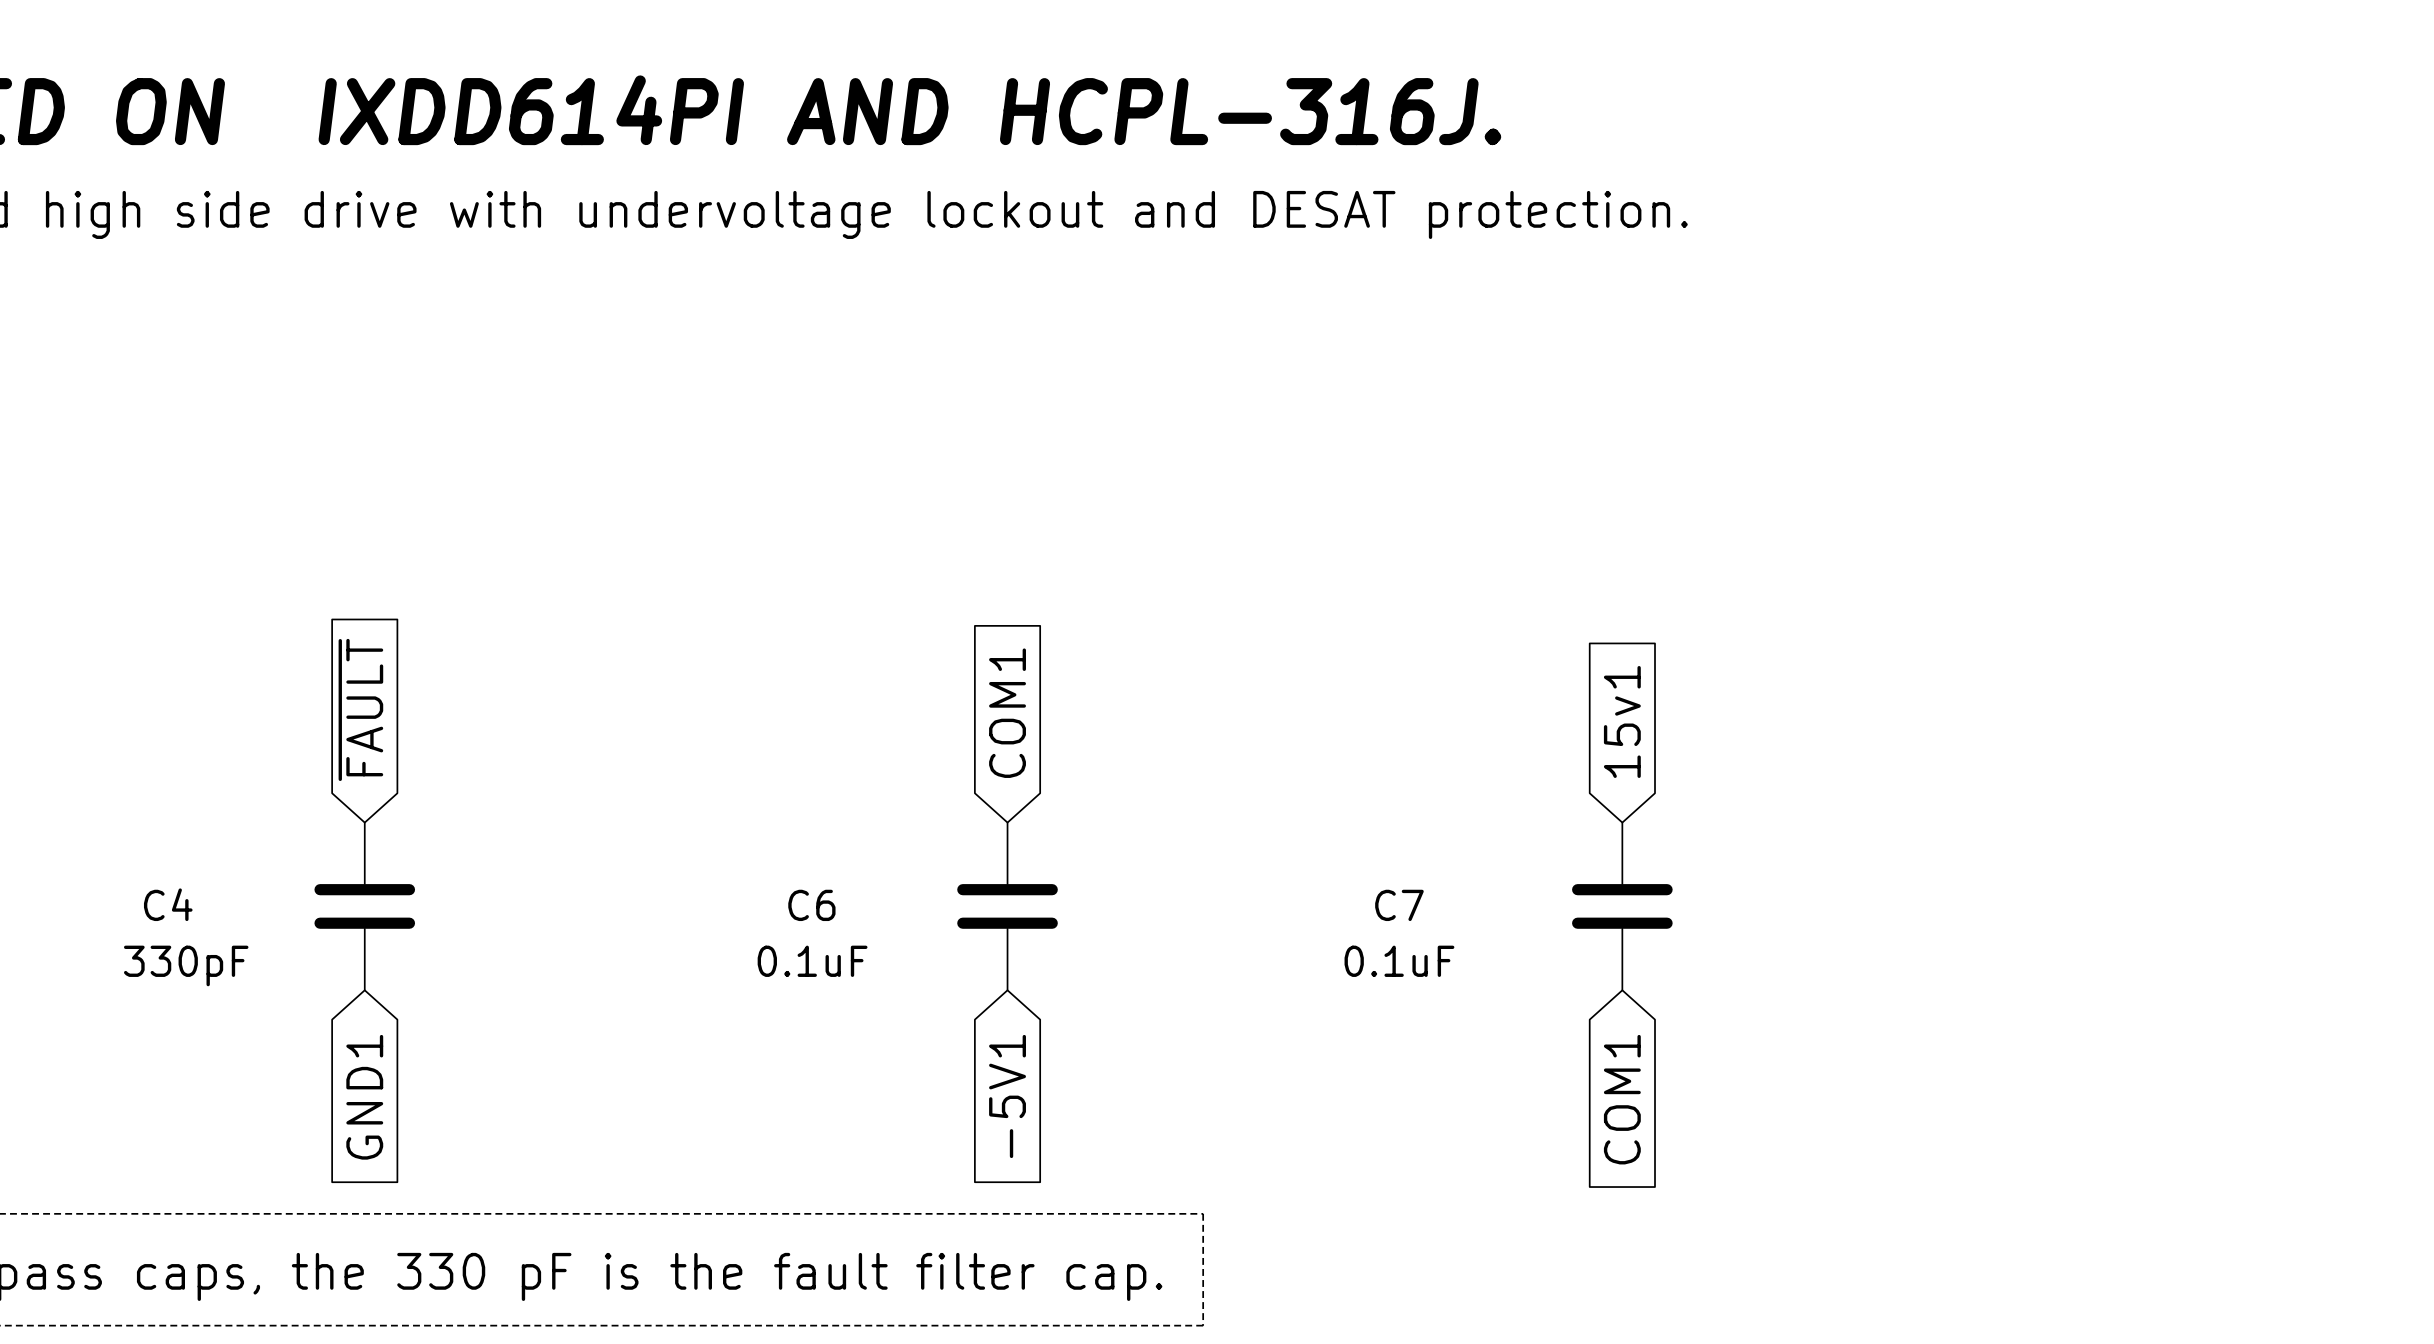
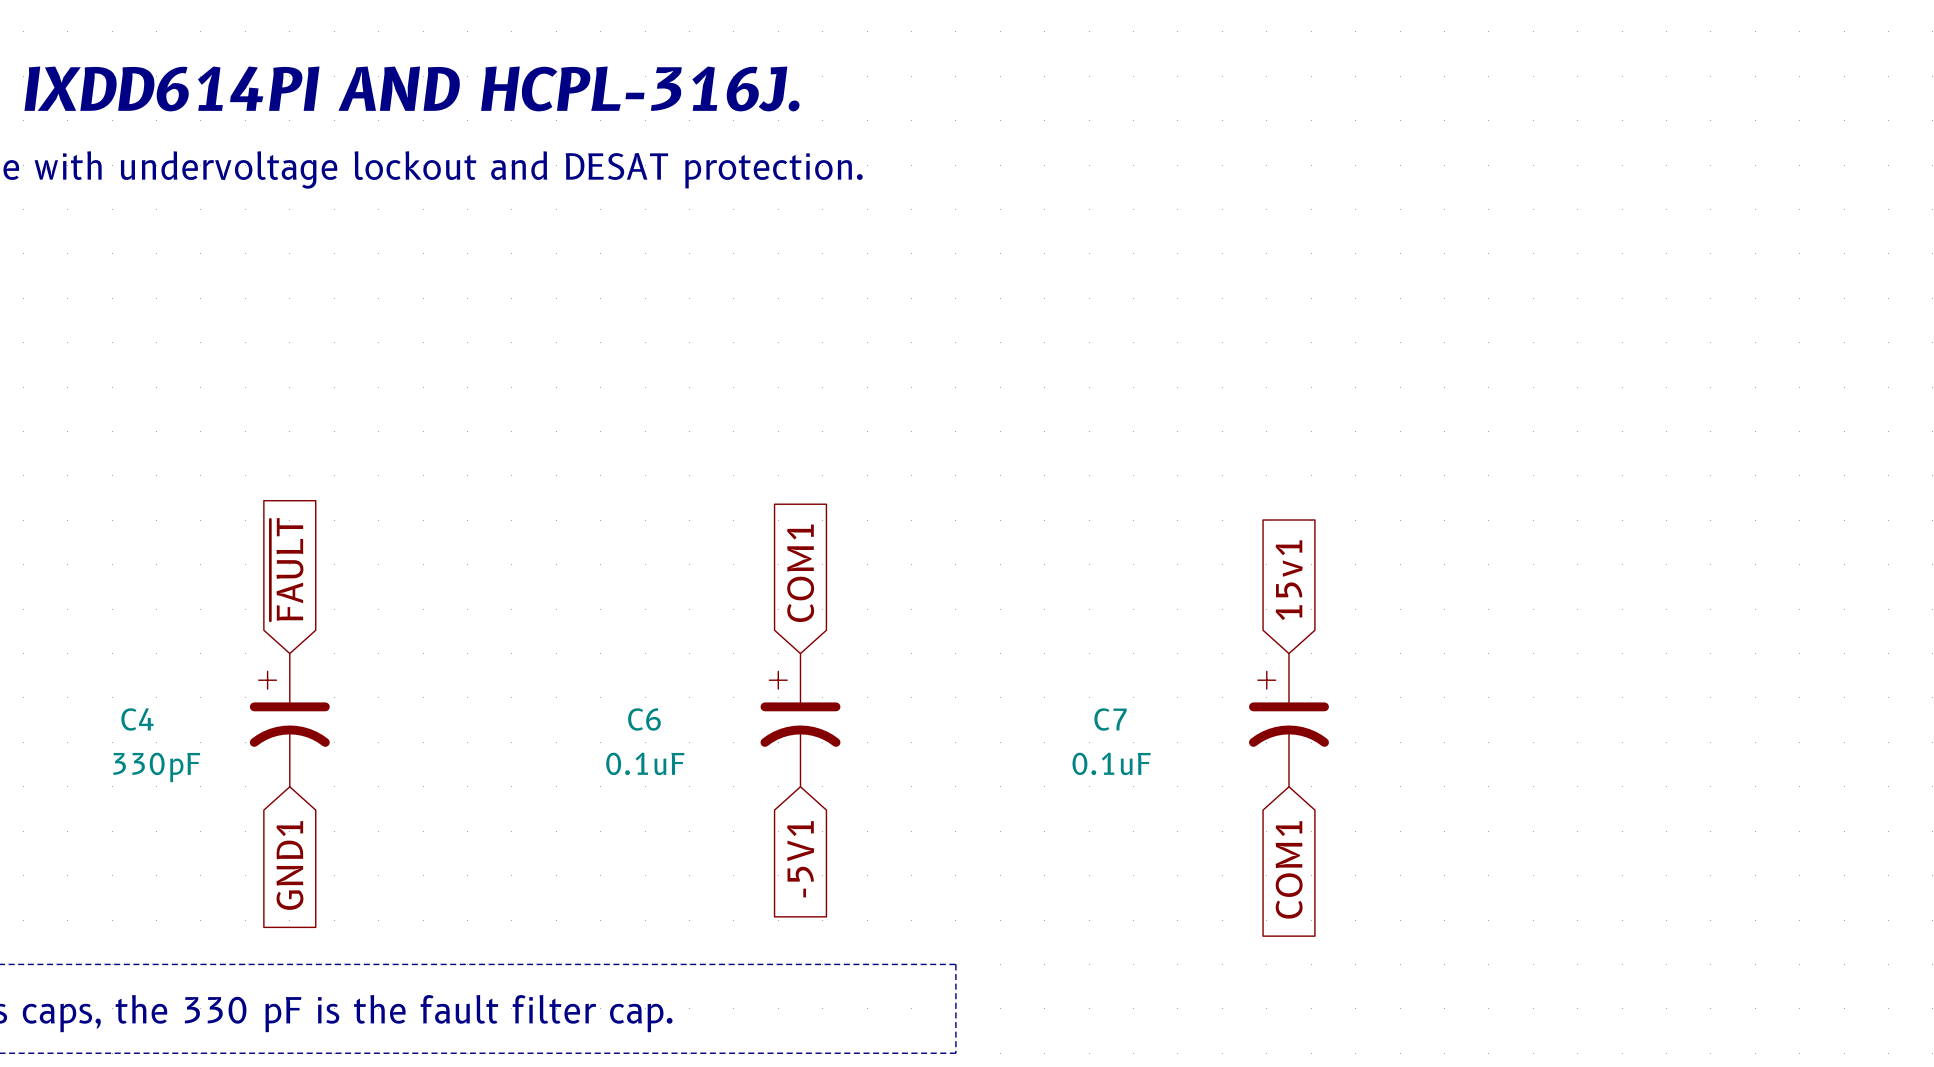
C4 symbol: [314, 822, 416, 991] -> [249, 653, 330, 787]
C6 symbol: [957, 822, 1058, 991] -> [760, 653, 841, 787]
C7 symbol: [1572, 822, 1673, 991] -> [1249, 653, 1329, 787]

